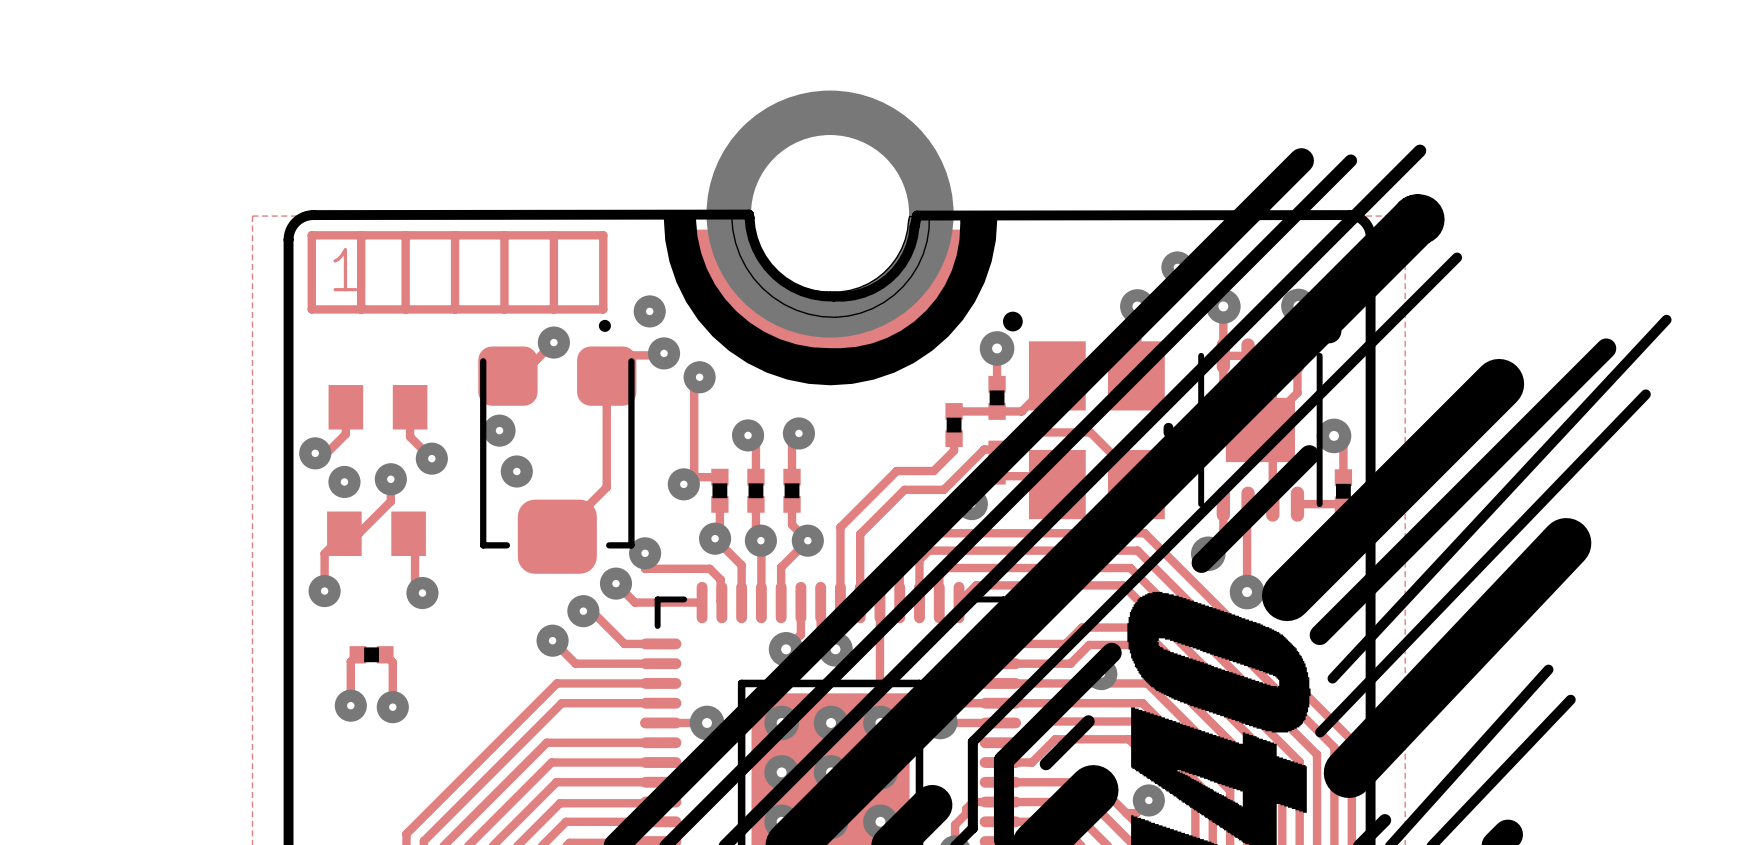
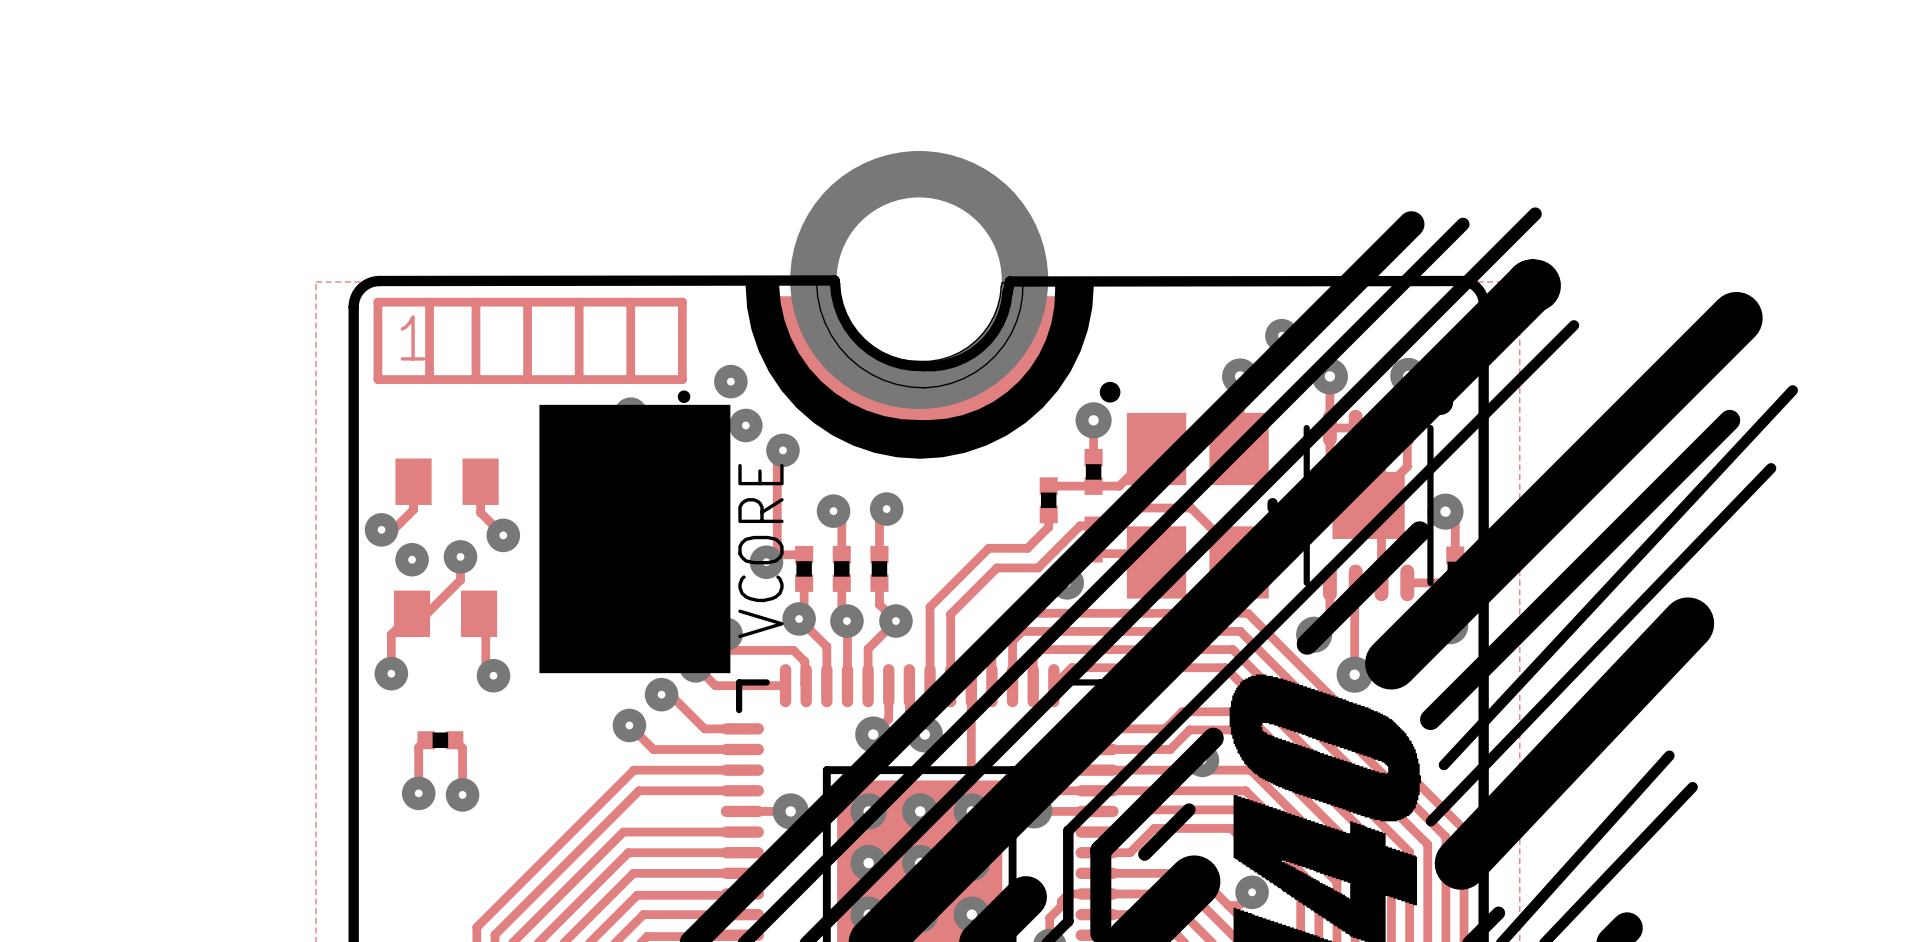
line: none -> (1736, 318) (1391, 663)
drawing: none -> [539, 404, 731, 674]
line: (1499, 384) (1287, 596) -> none
text: none -> VCORE (760, 551)

